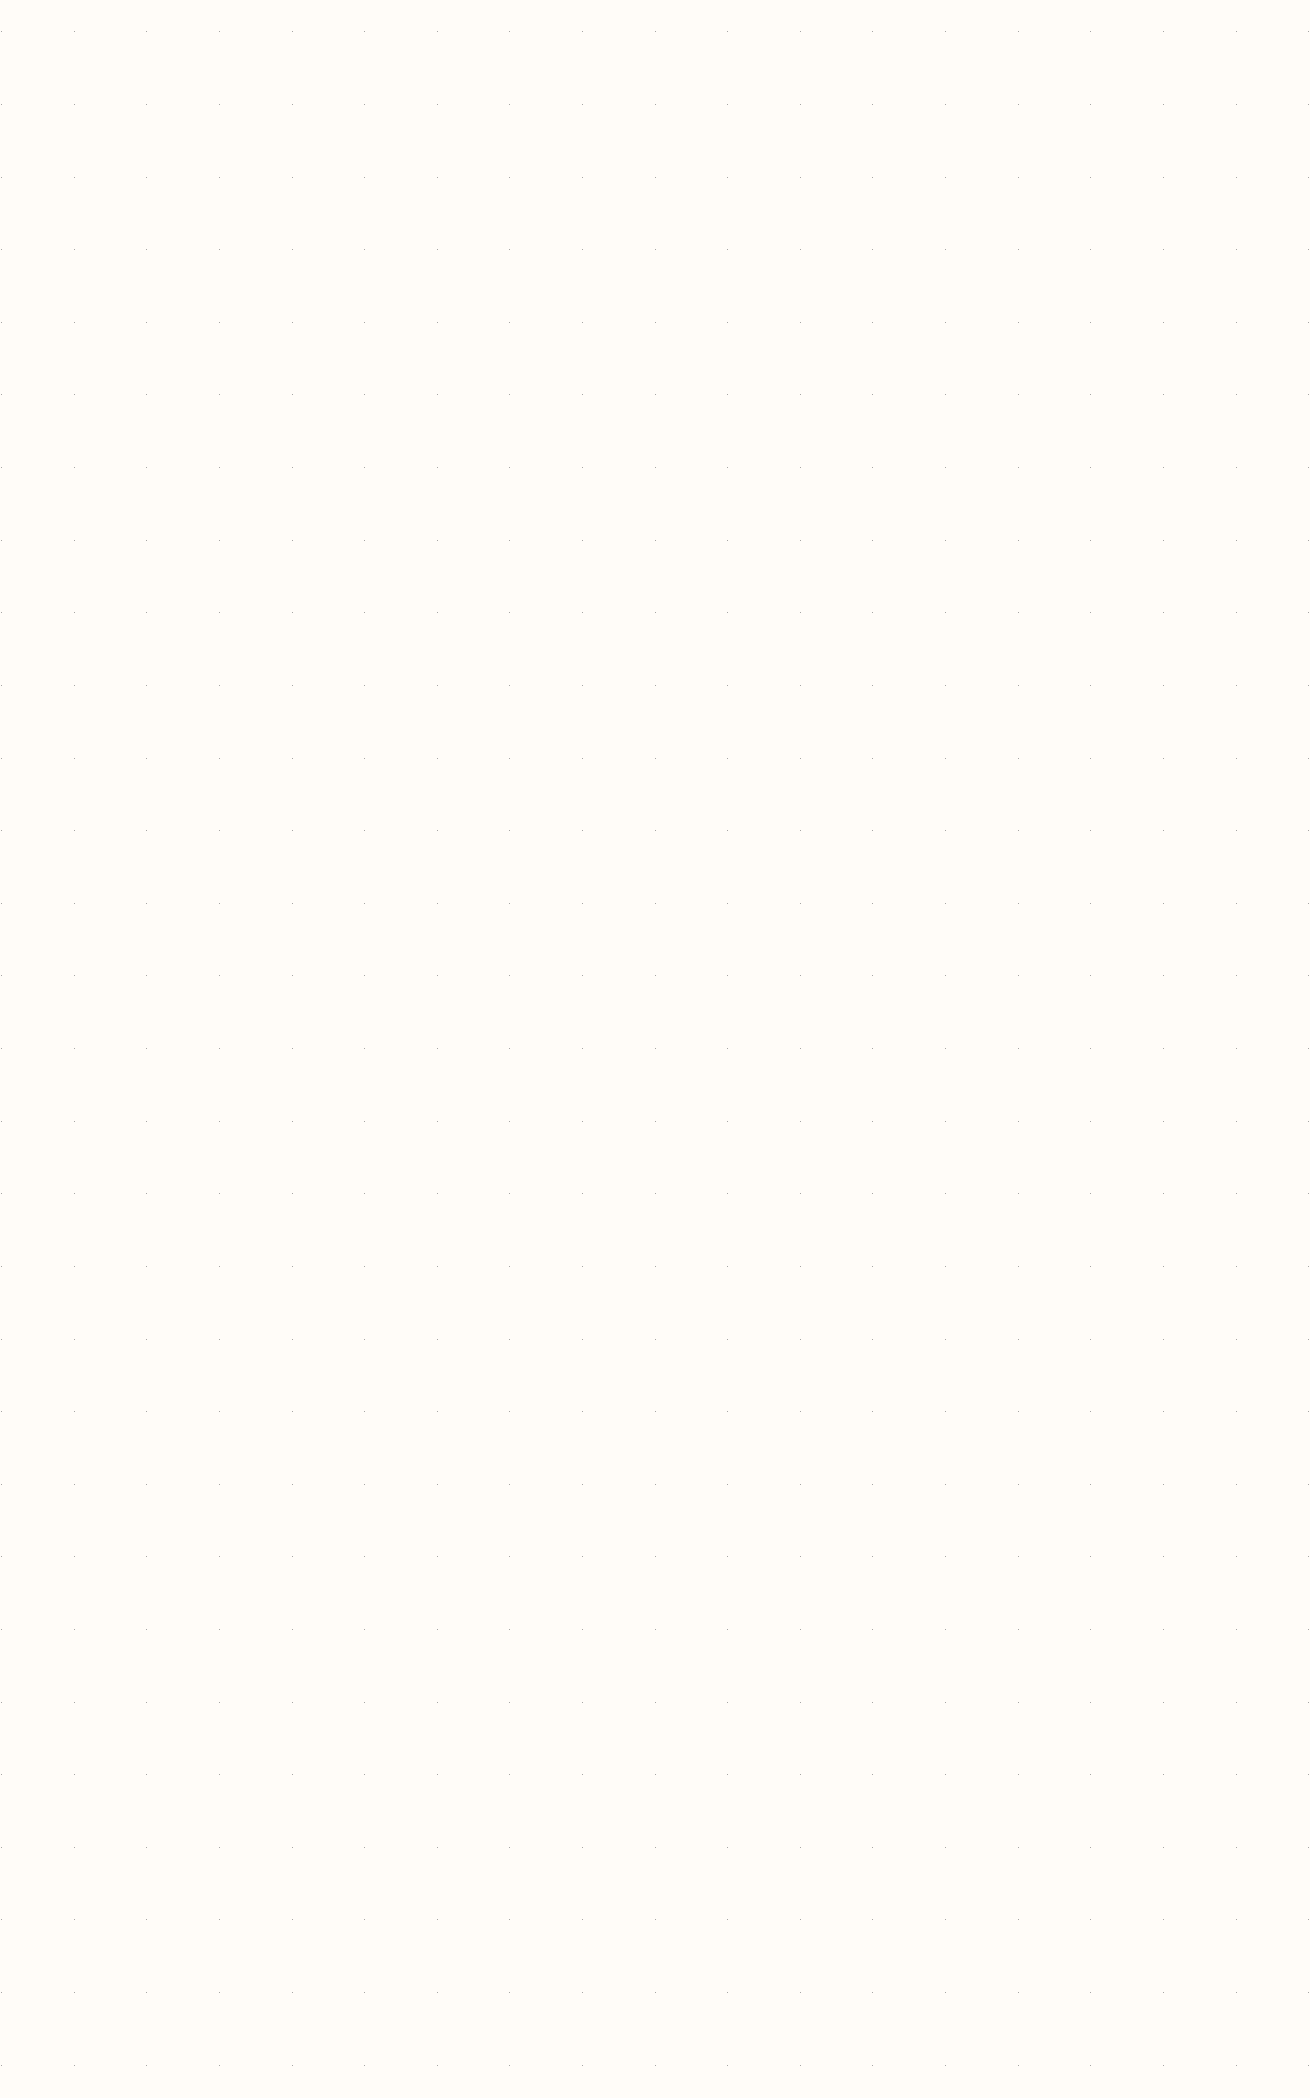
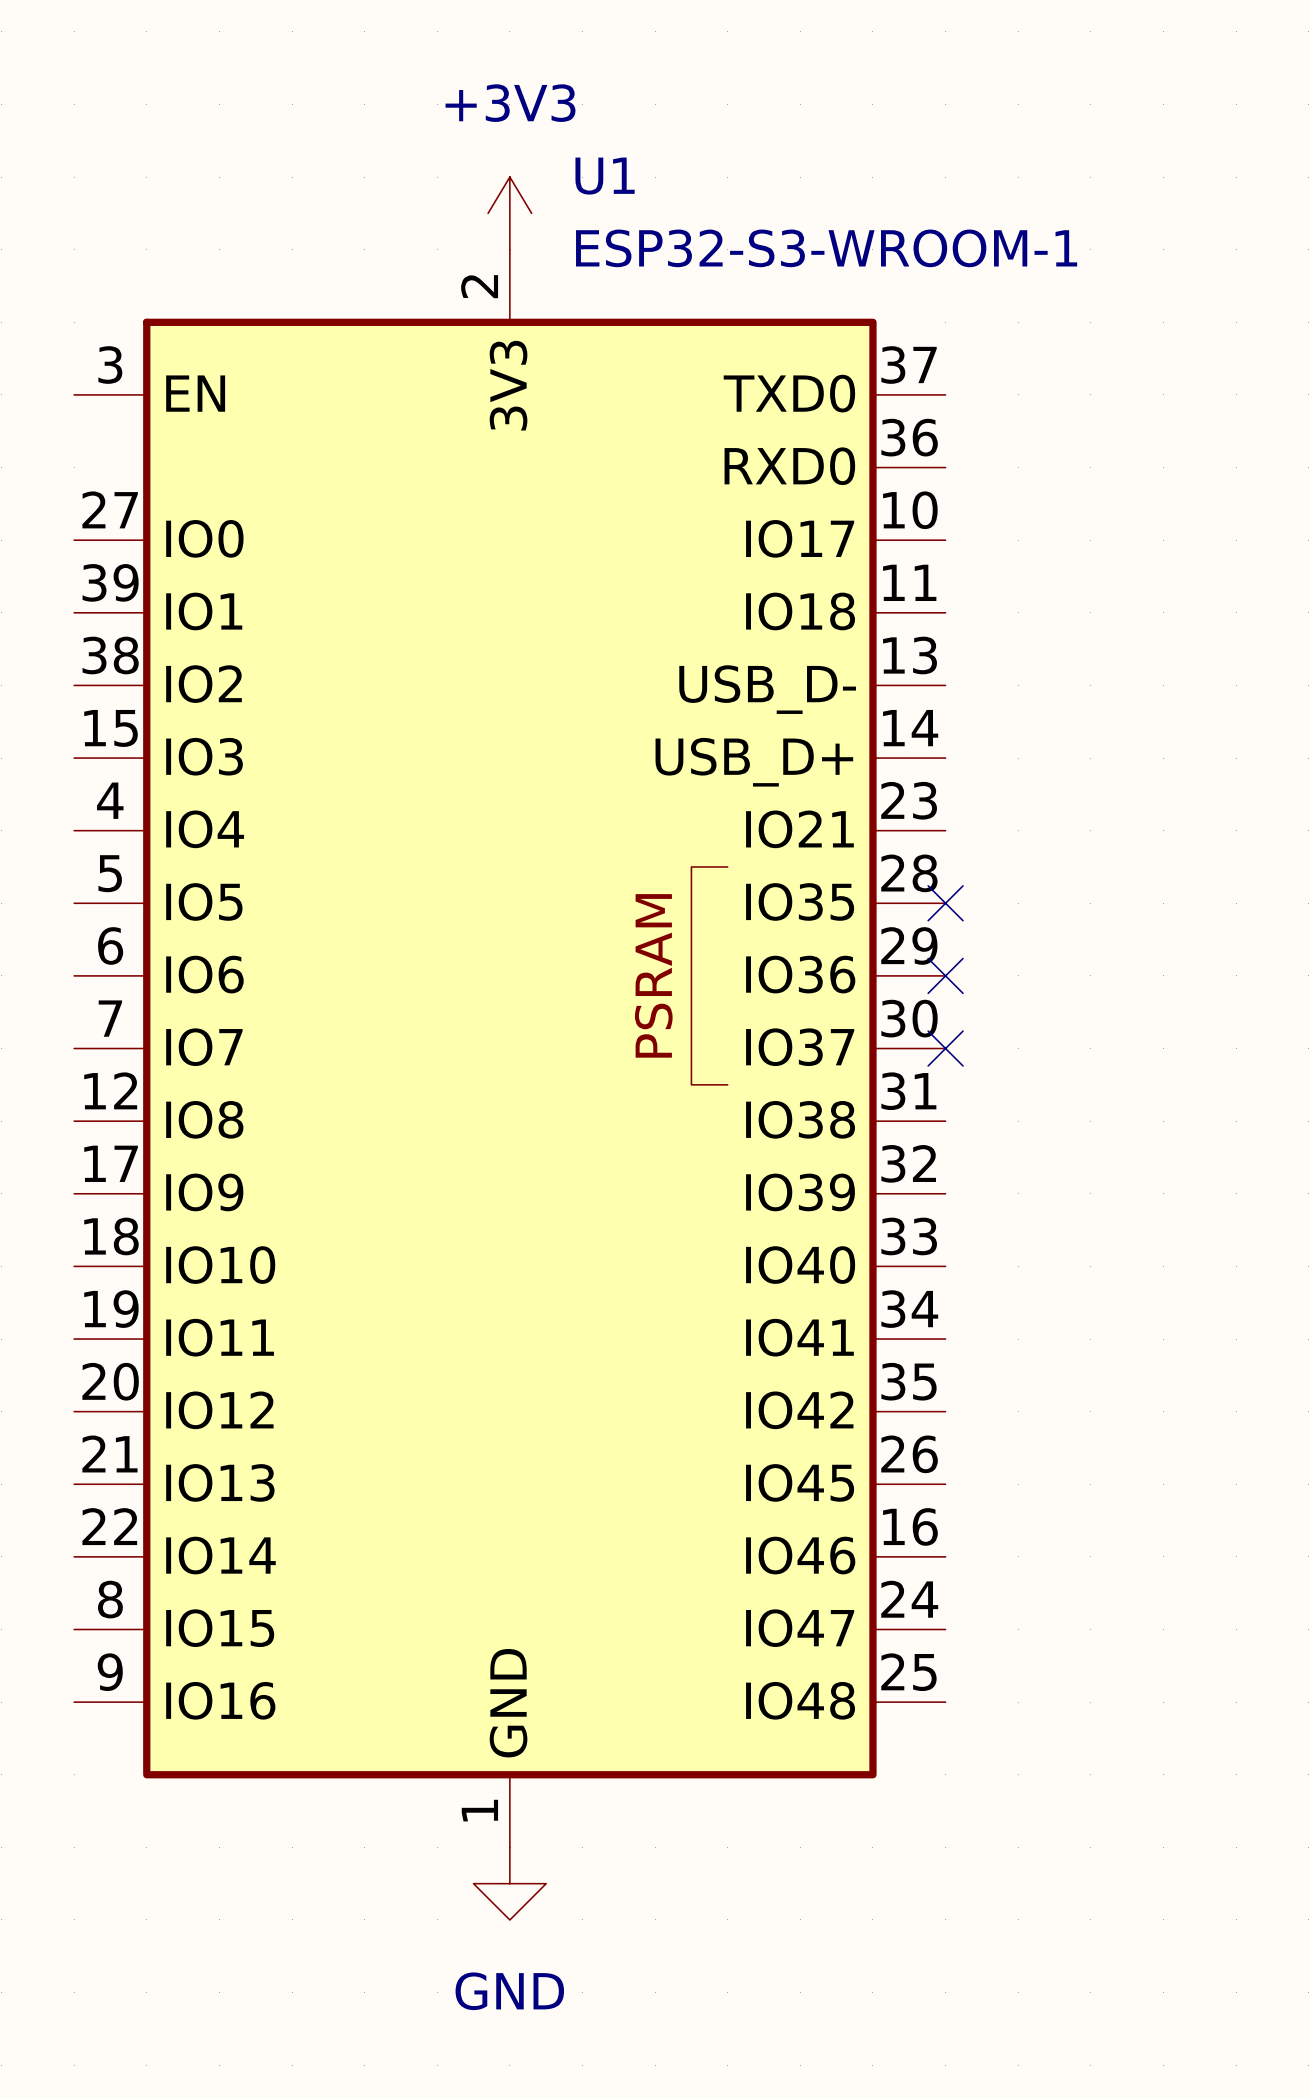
power symbol: none -> +3V3 (509, 213)
no-connect mark: none -> (945, 903)
no-connect mark: none -> (945, 975)
U1: none -> ESP32-S3-WROOM-1 (509, 1048)
no-connect mark: none -> (945, 1048)
power symbol: none -> GND (509, 1883)

